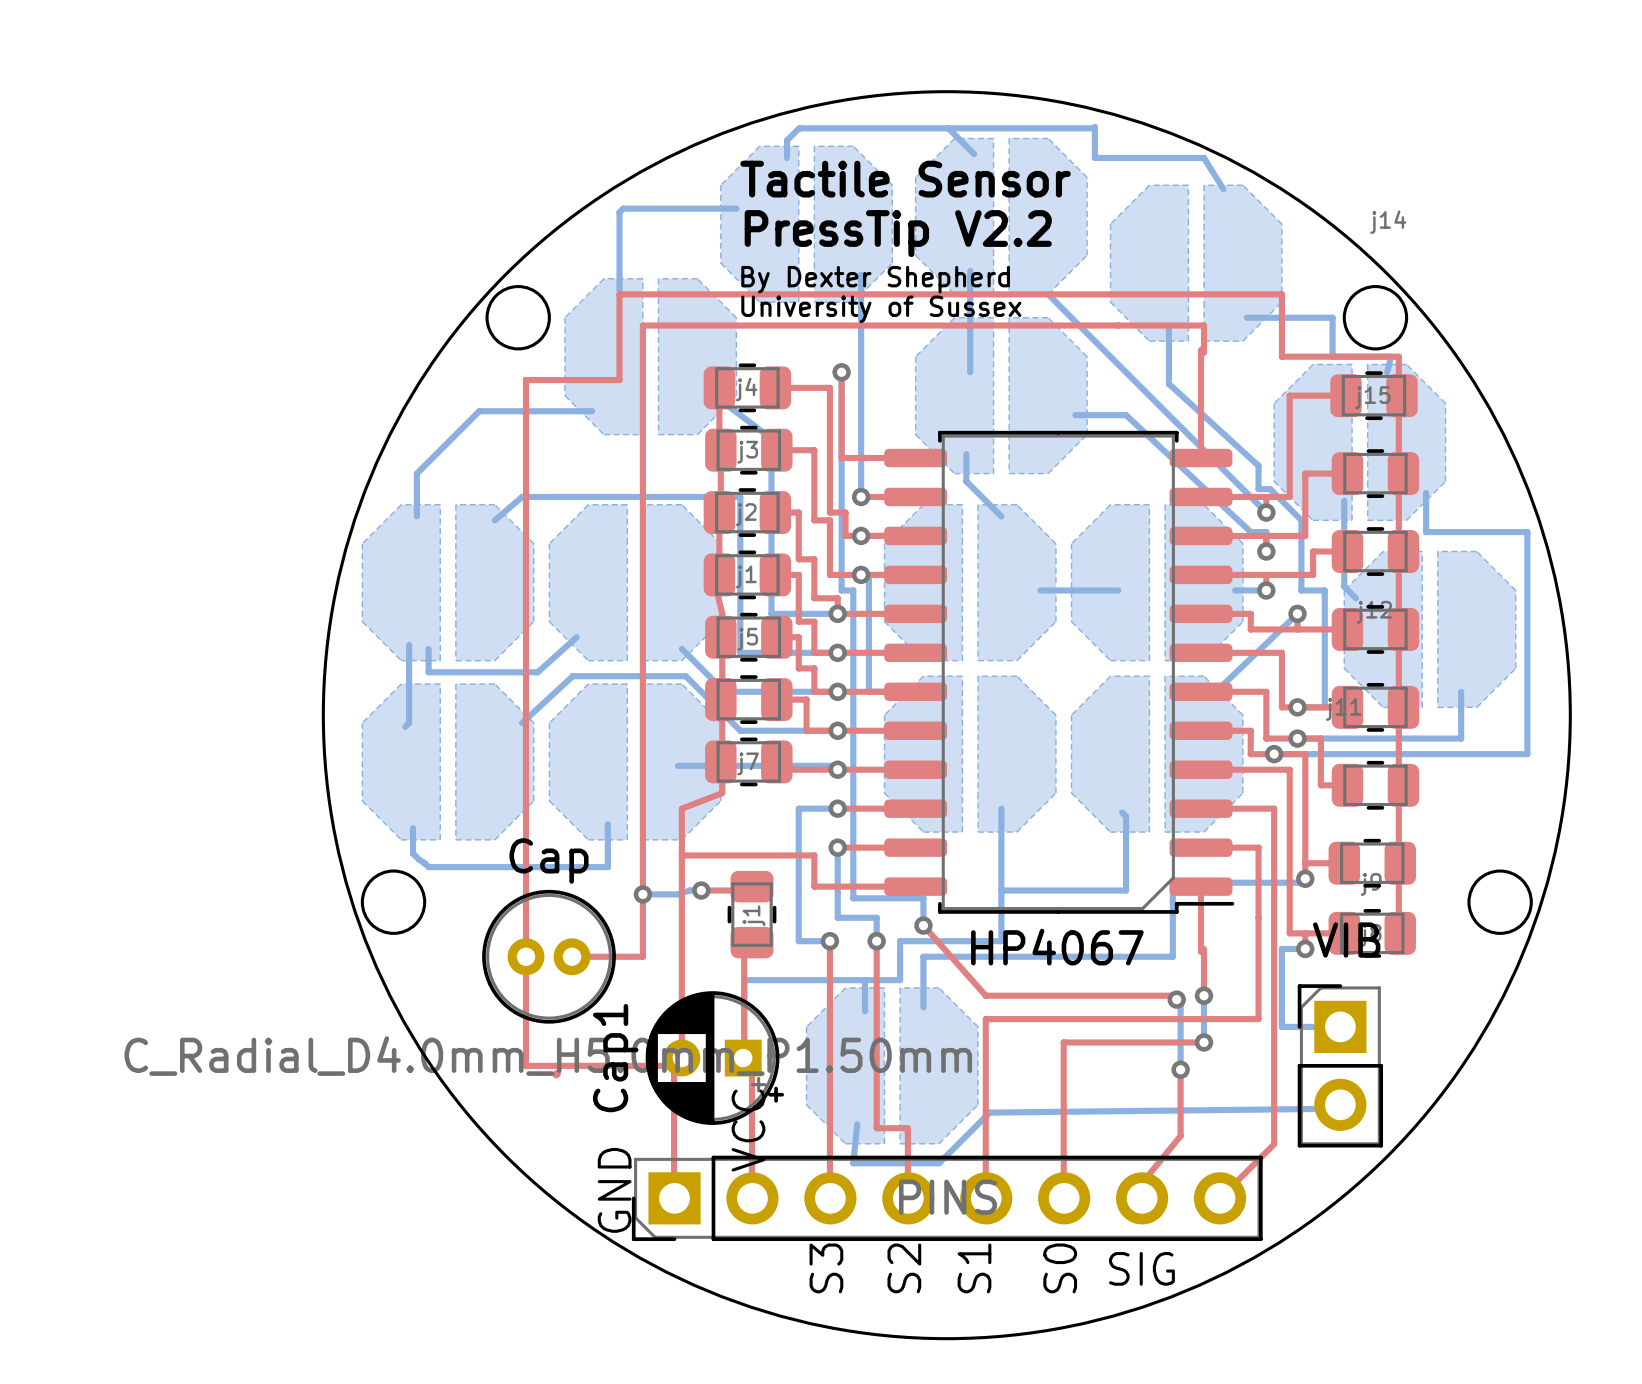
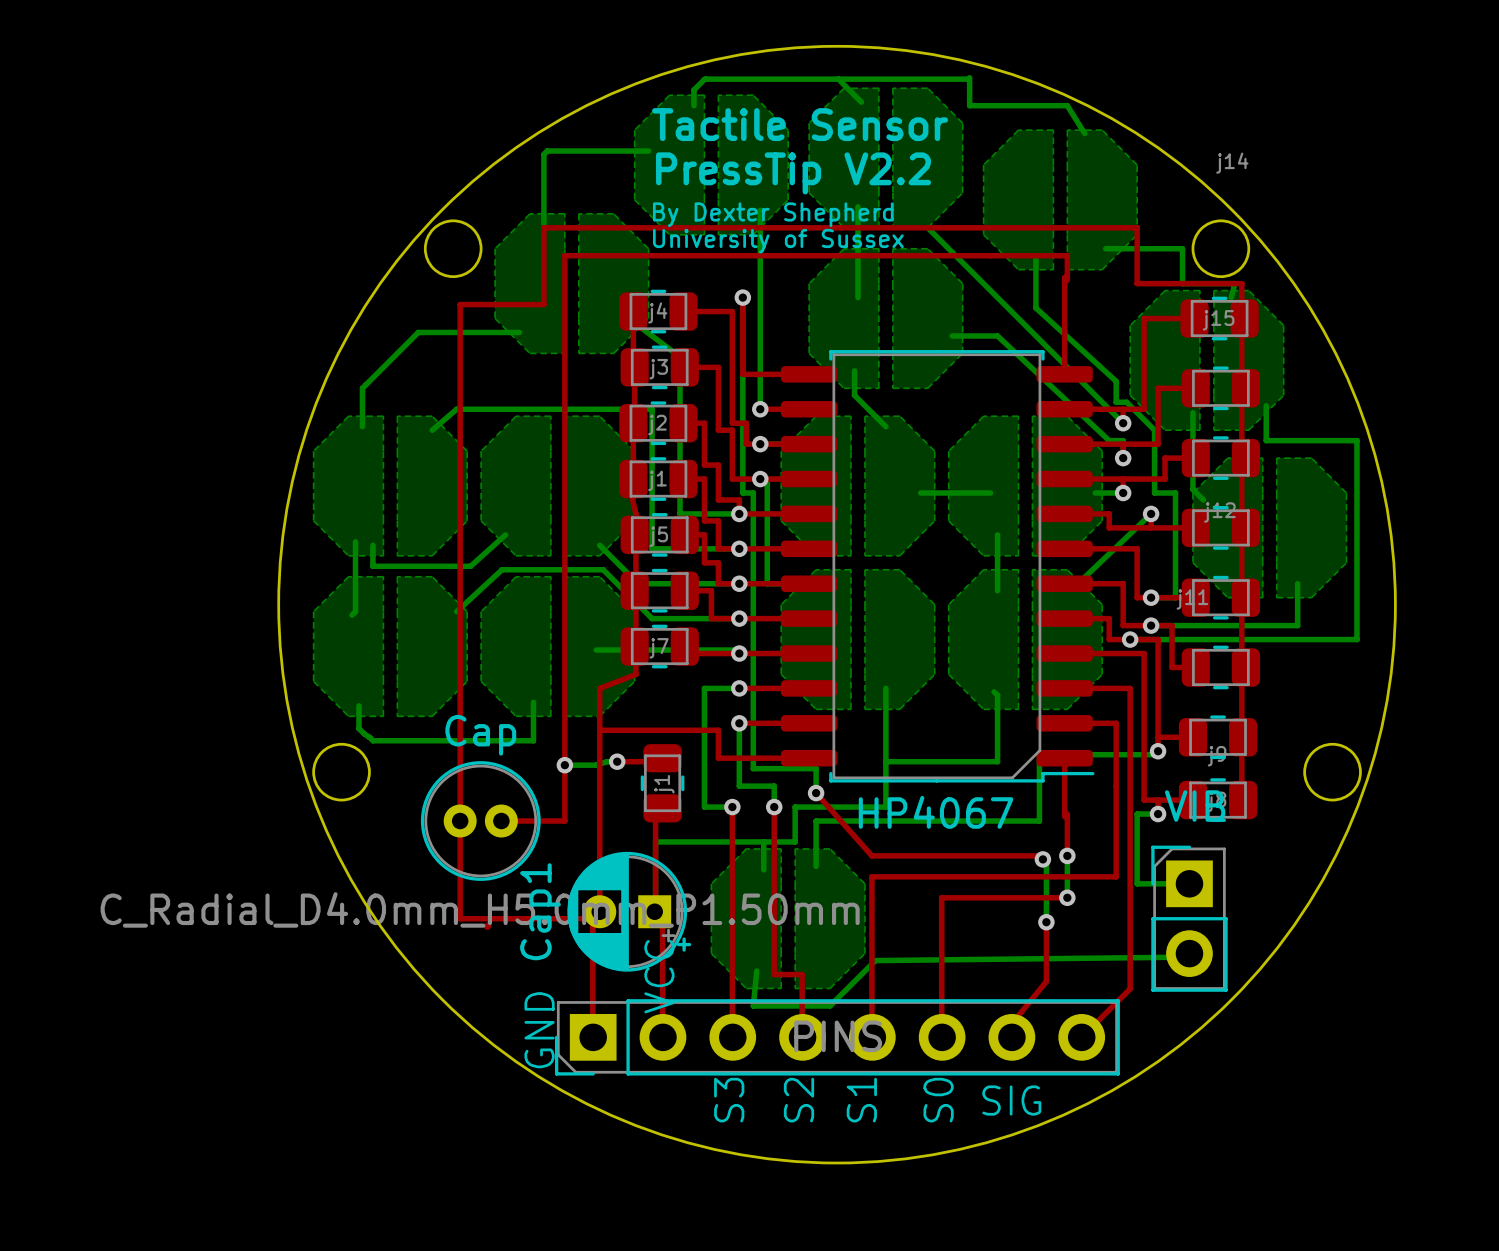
bottom track: none -> (997, 534) (997, 590)

